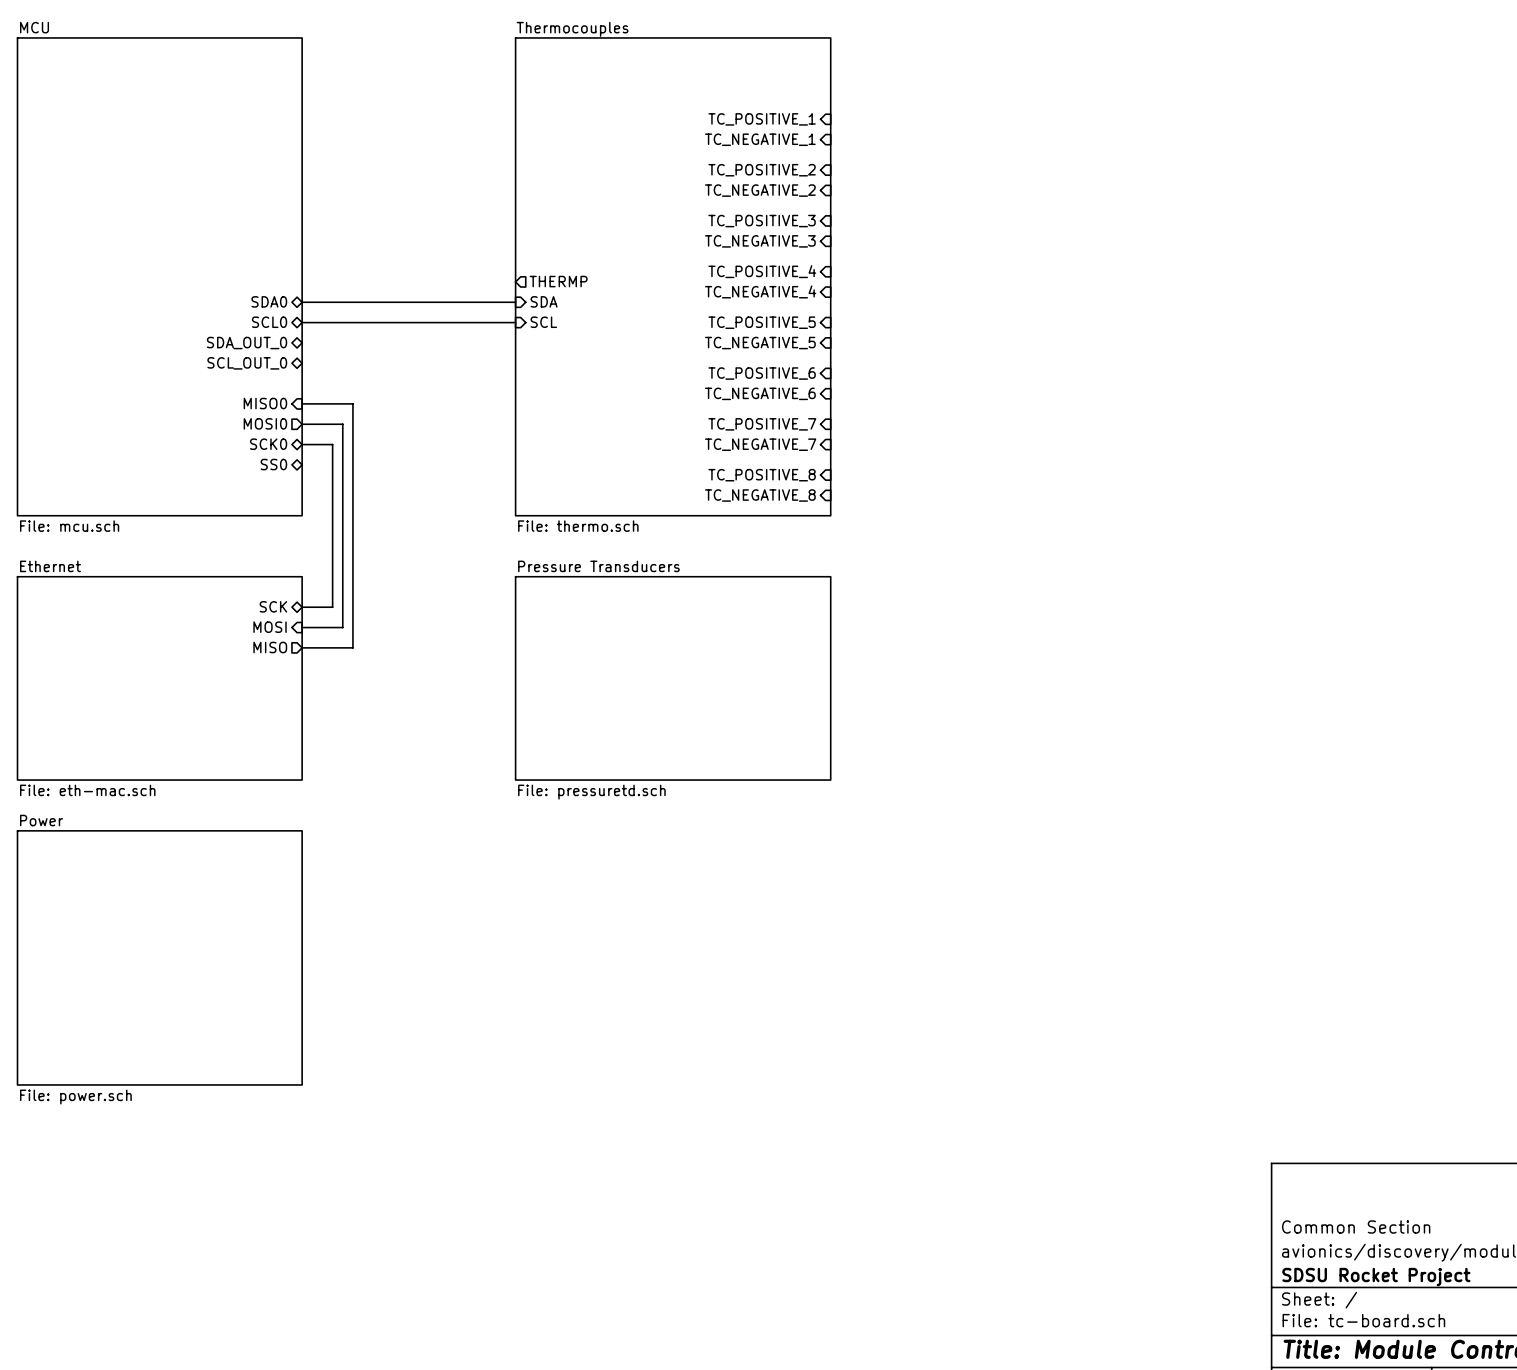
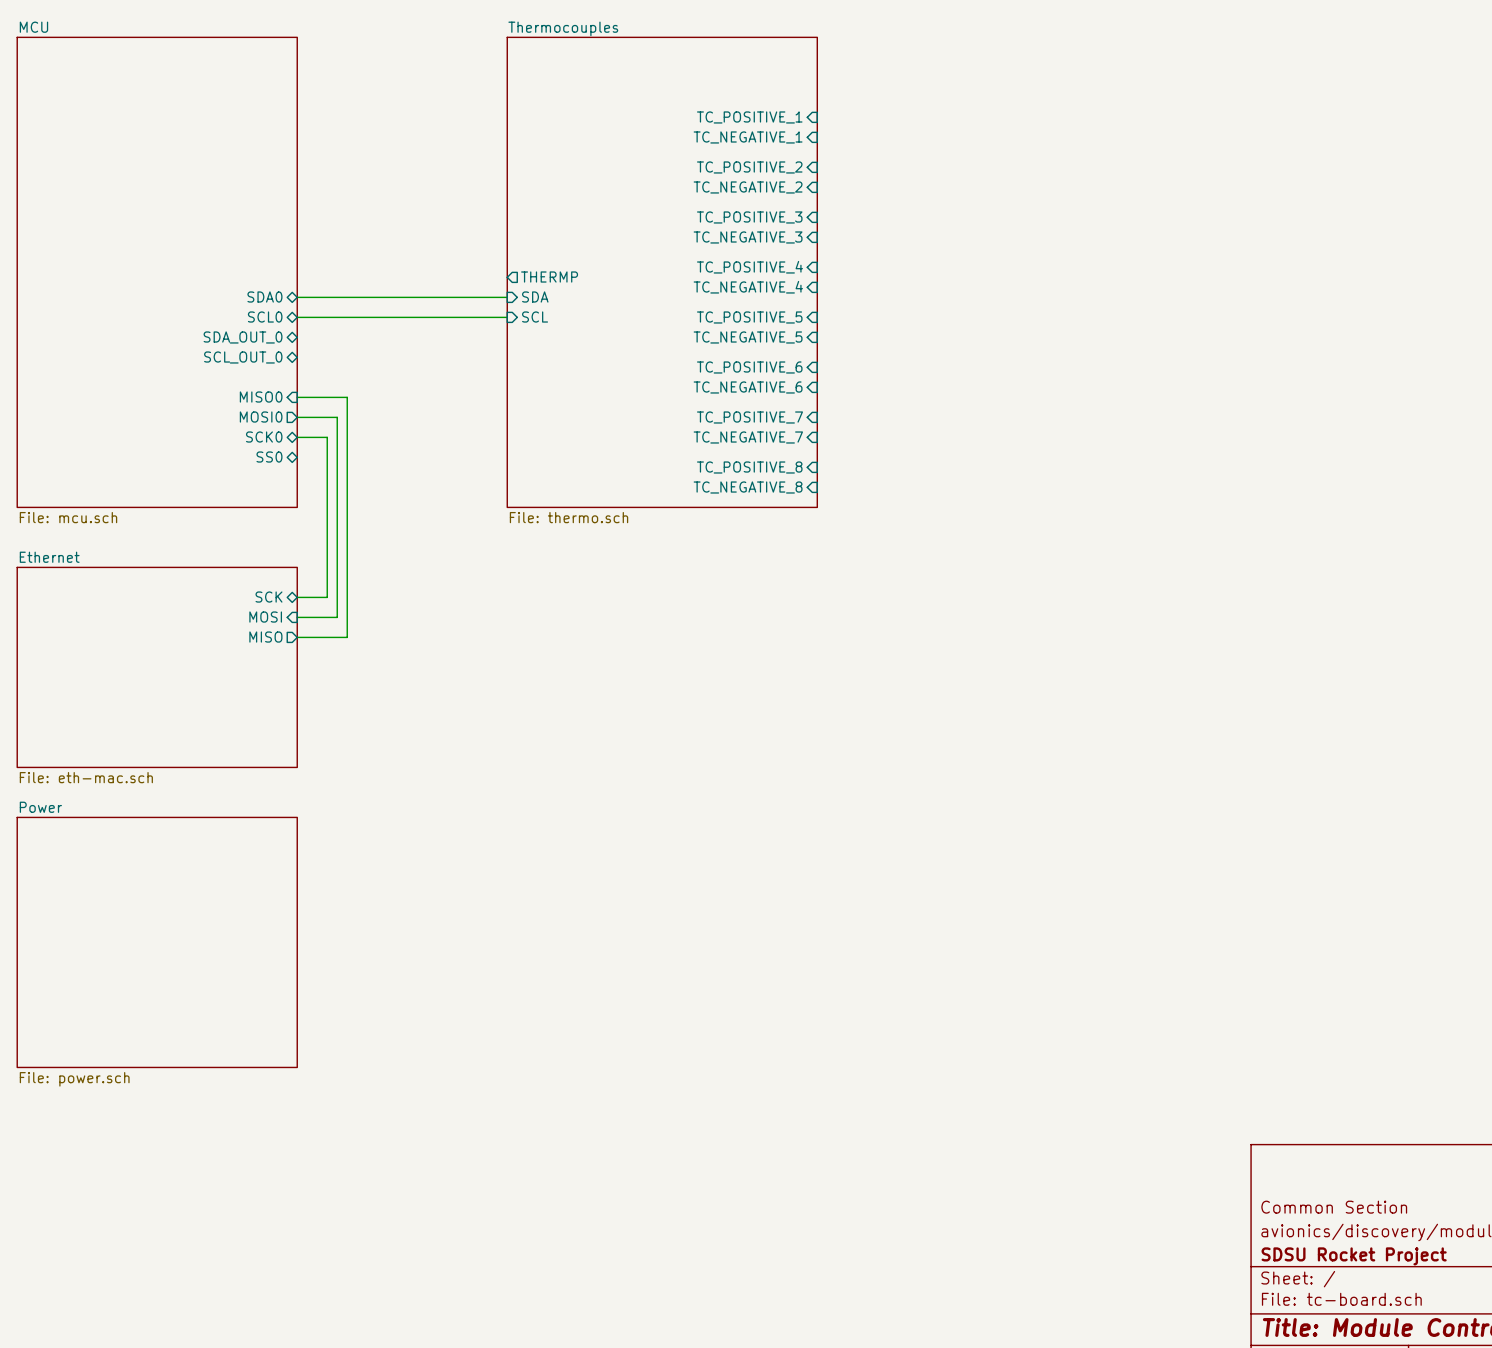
sheet Pressure Transducers: File: pressuretd.sch (673, 678) -> none

